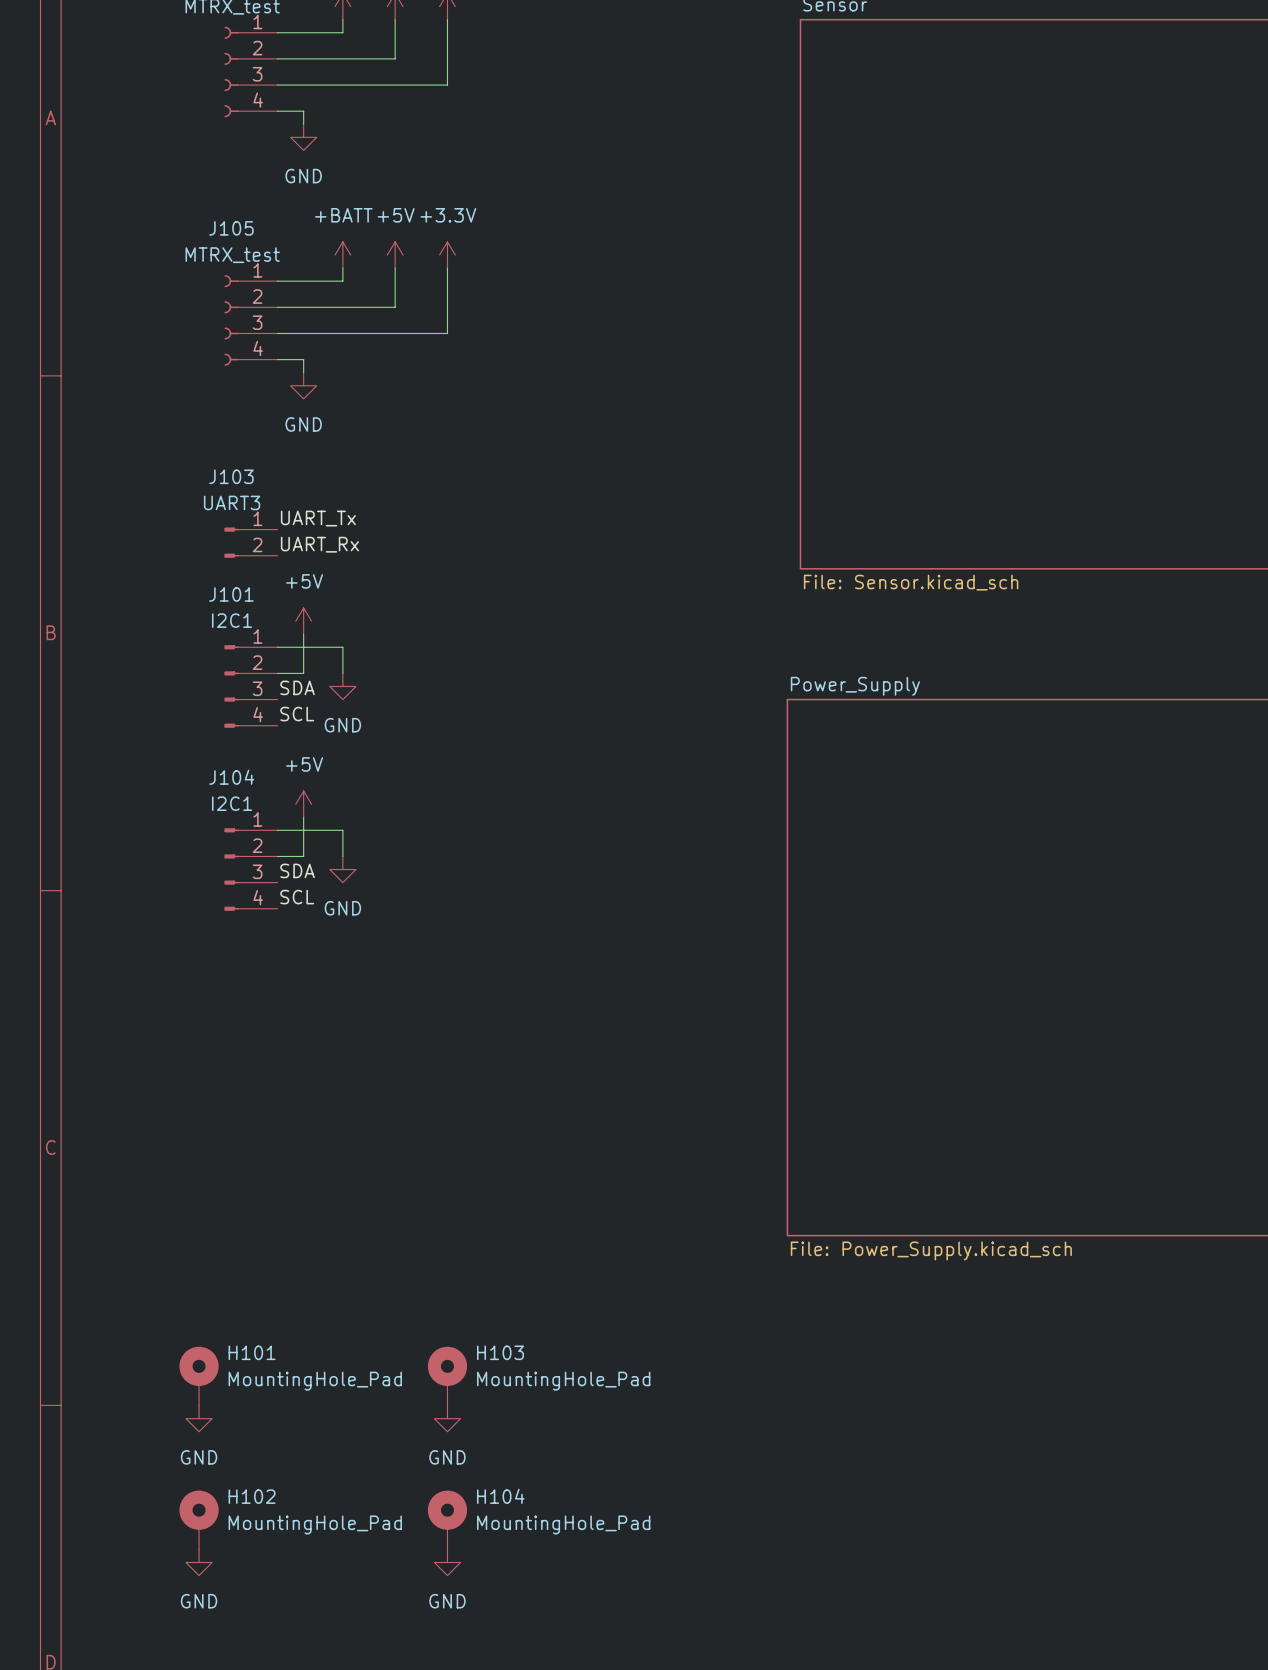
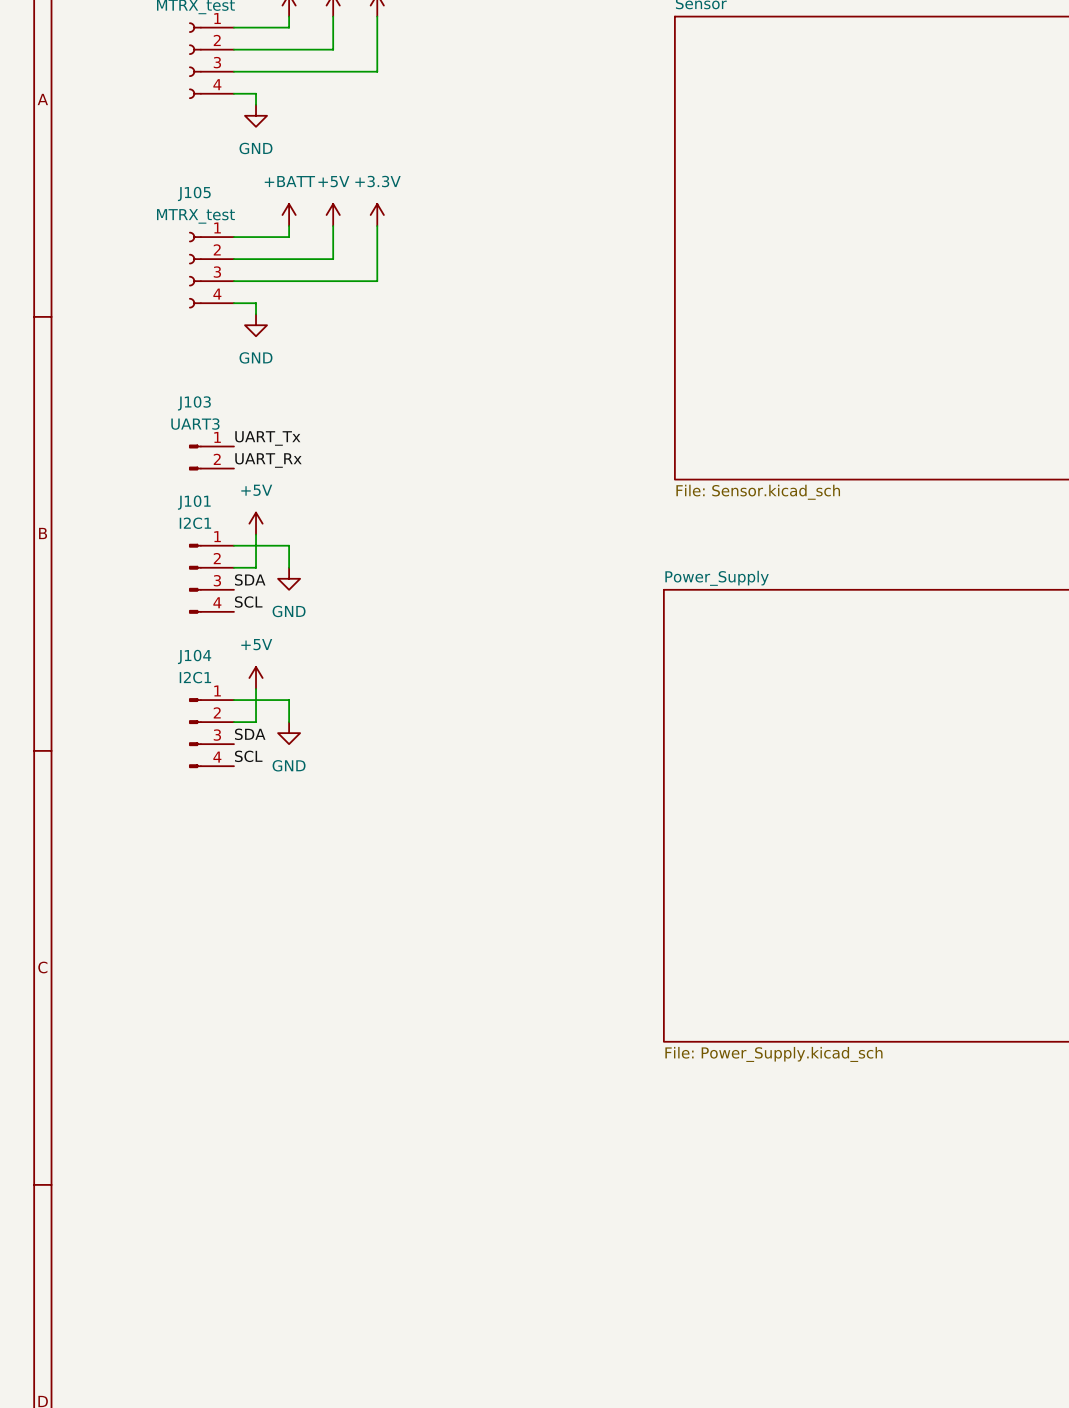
H101: MountingHole_Pad (199, 1376) -> none
H103: MountingHole_Pad (447, 1376) -> none
power symbol: GND (199, 1418) -> none
power symbol: GND (447, 1418) -> none
H102: MountingHole_Pad (199, 1520) -> none
H104: MountingHole_Pad (447, 1520) -> none
power symbol: GND (199, 1562) -> none
power symbol: GND (447, 1562) -> none

